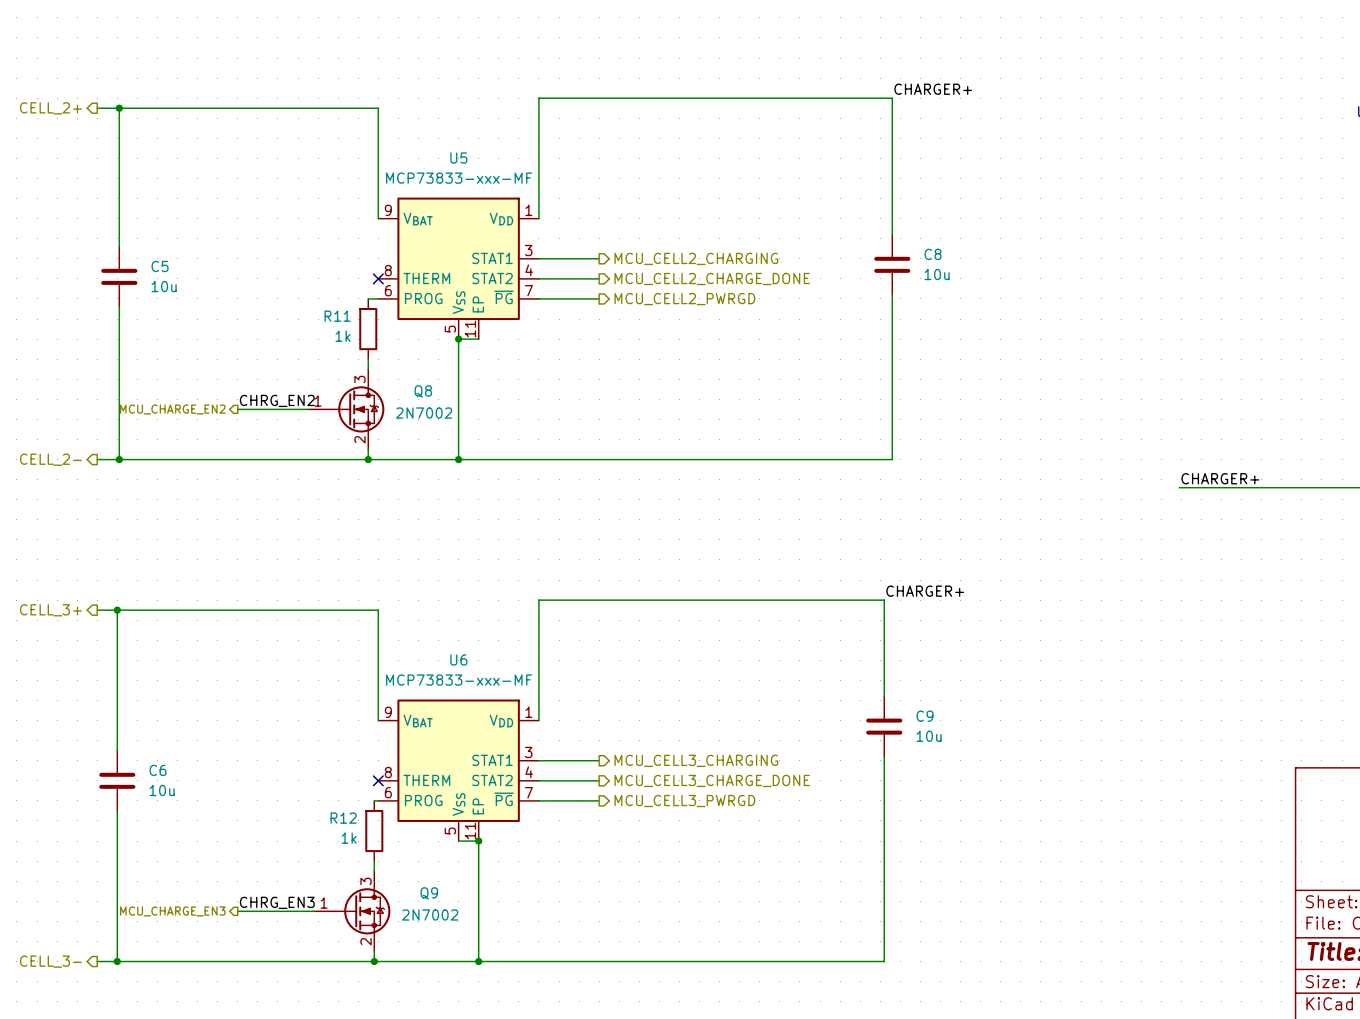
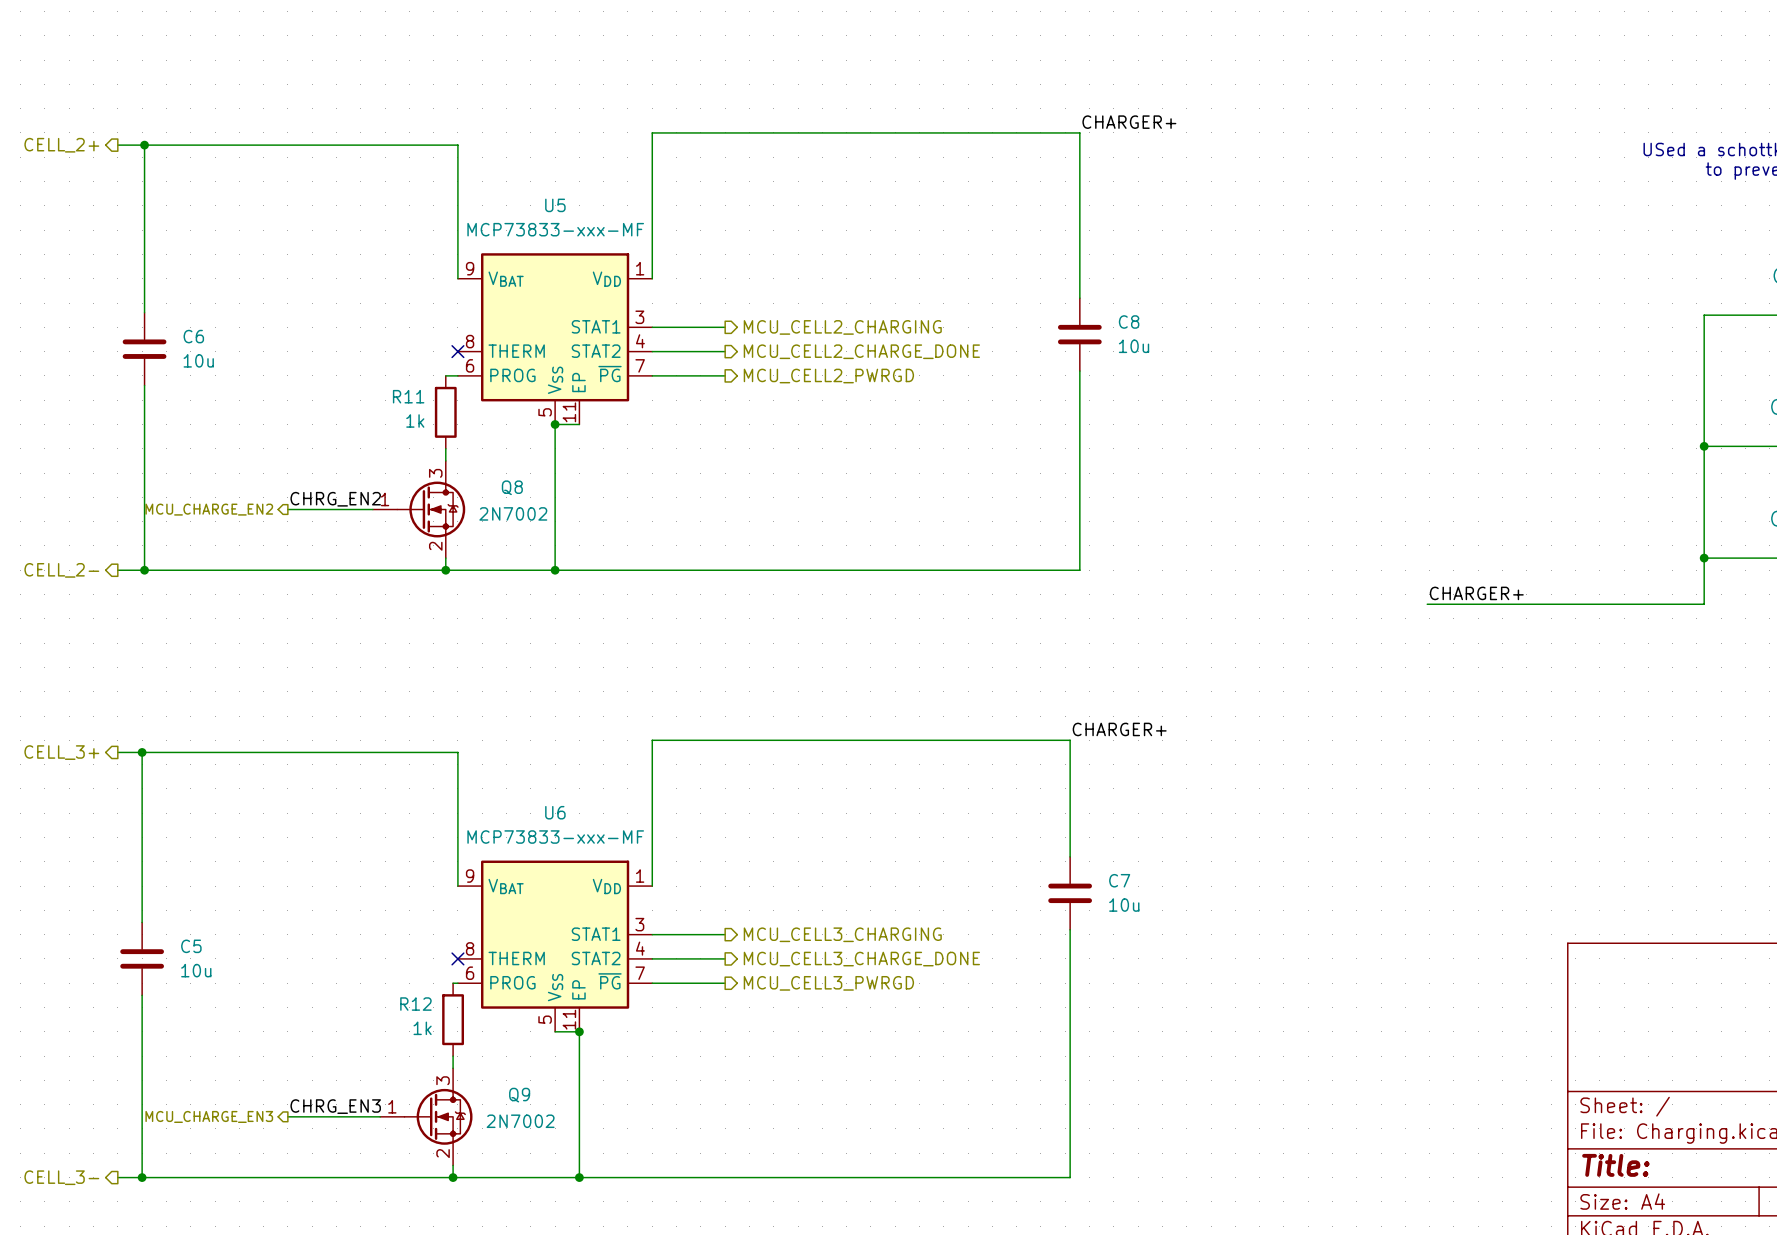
C5 name: C5 (160, 266) -> C6 (193, 336)
C9 name: C9 (924, 716) -> C7 (1119, 880)
C6 name: C6 (158, 770) -> C5 (191, 946)

